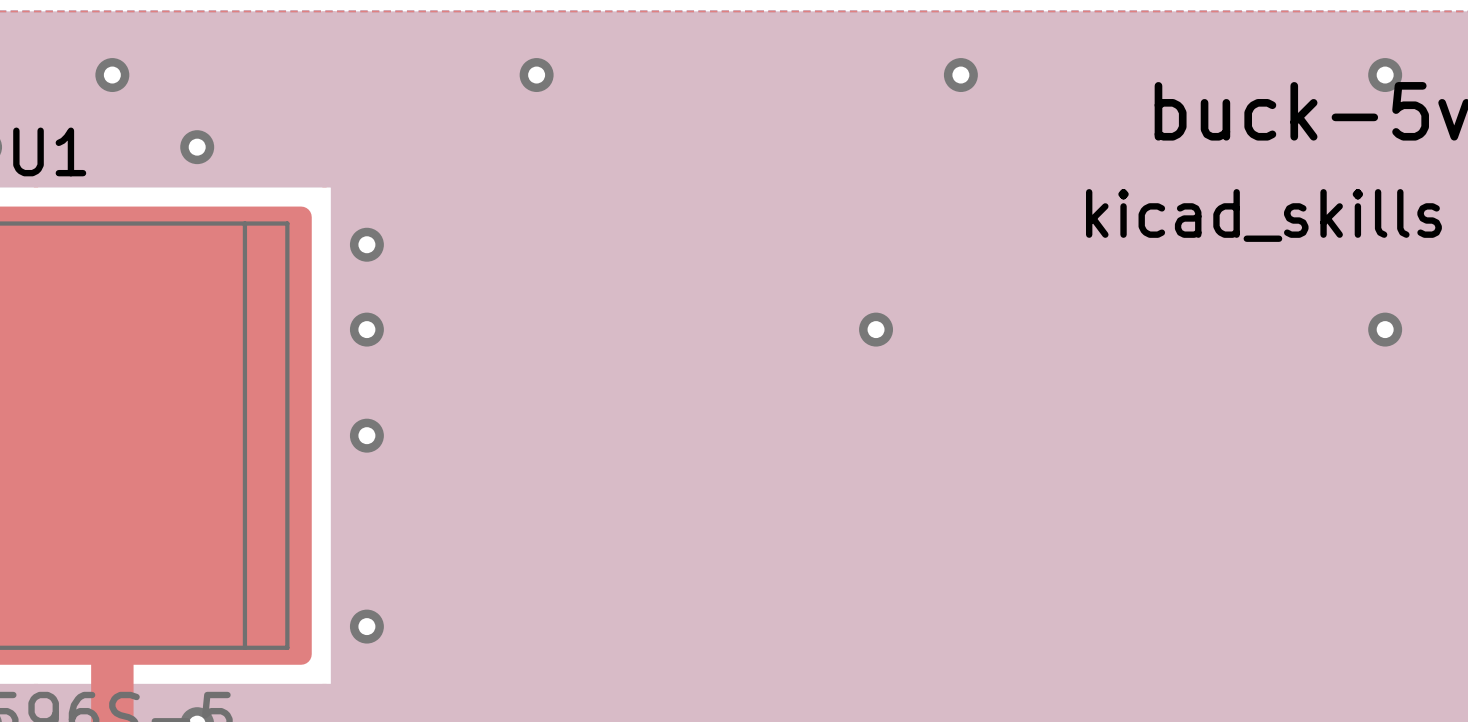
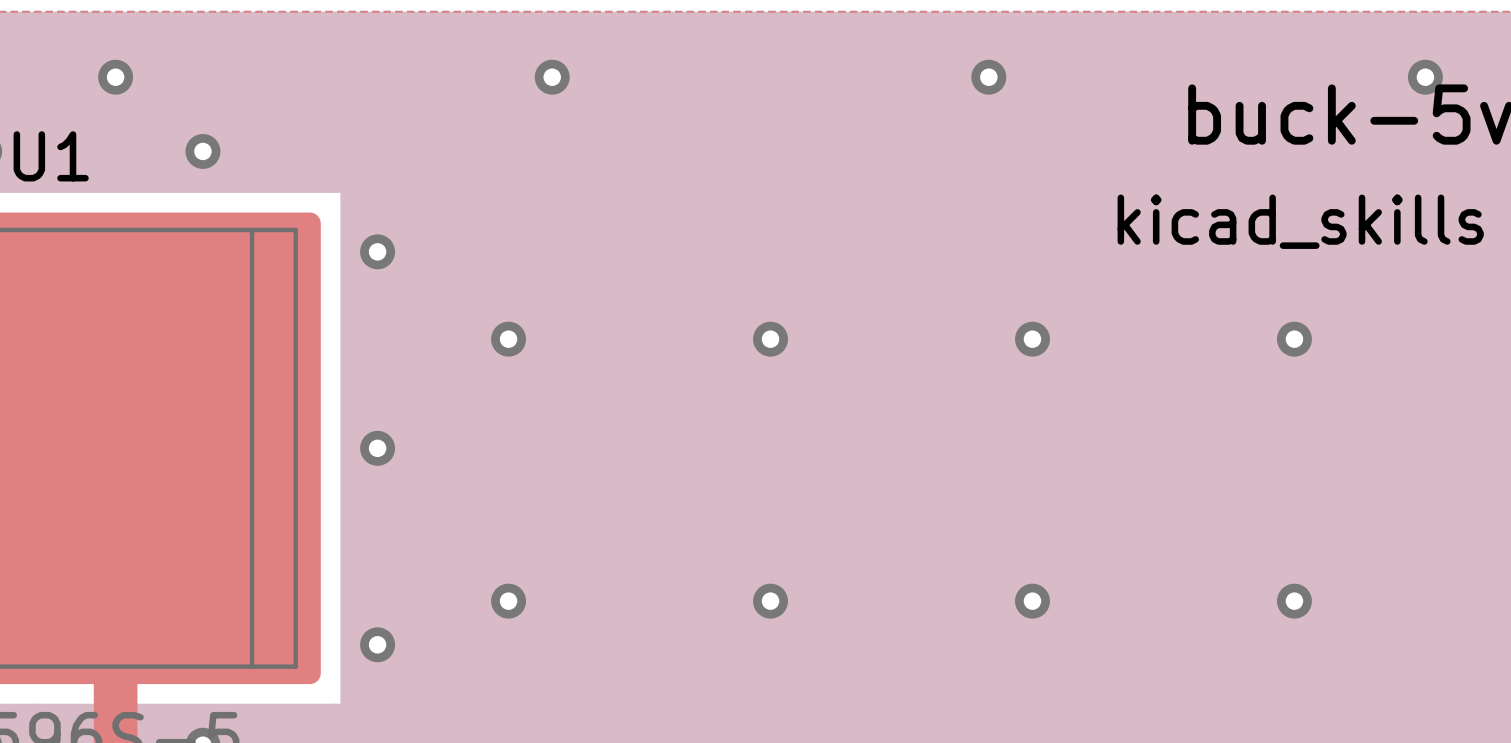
via position: (366, 329) -> (508, 339)
via: none -> (770, 339)
via: (876, 329) -> none
via: none -> (1032, 339)
via: none -> (1294, 339)
via: (1385, 329) -> none
via: none -> (508, 601)
via: none -> (770, 601)
via: none -> (1032, 601)
via: none -> (1294, 601)

